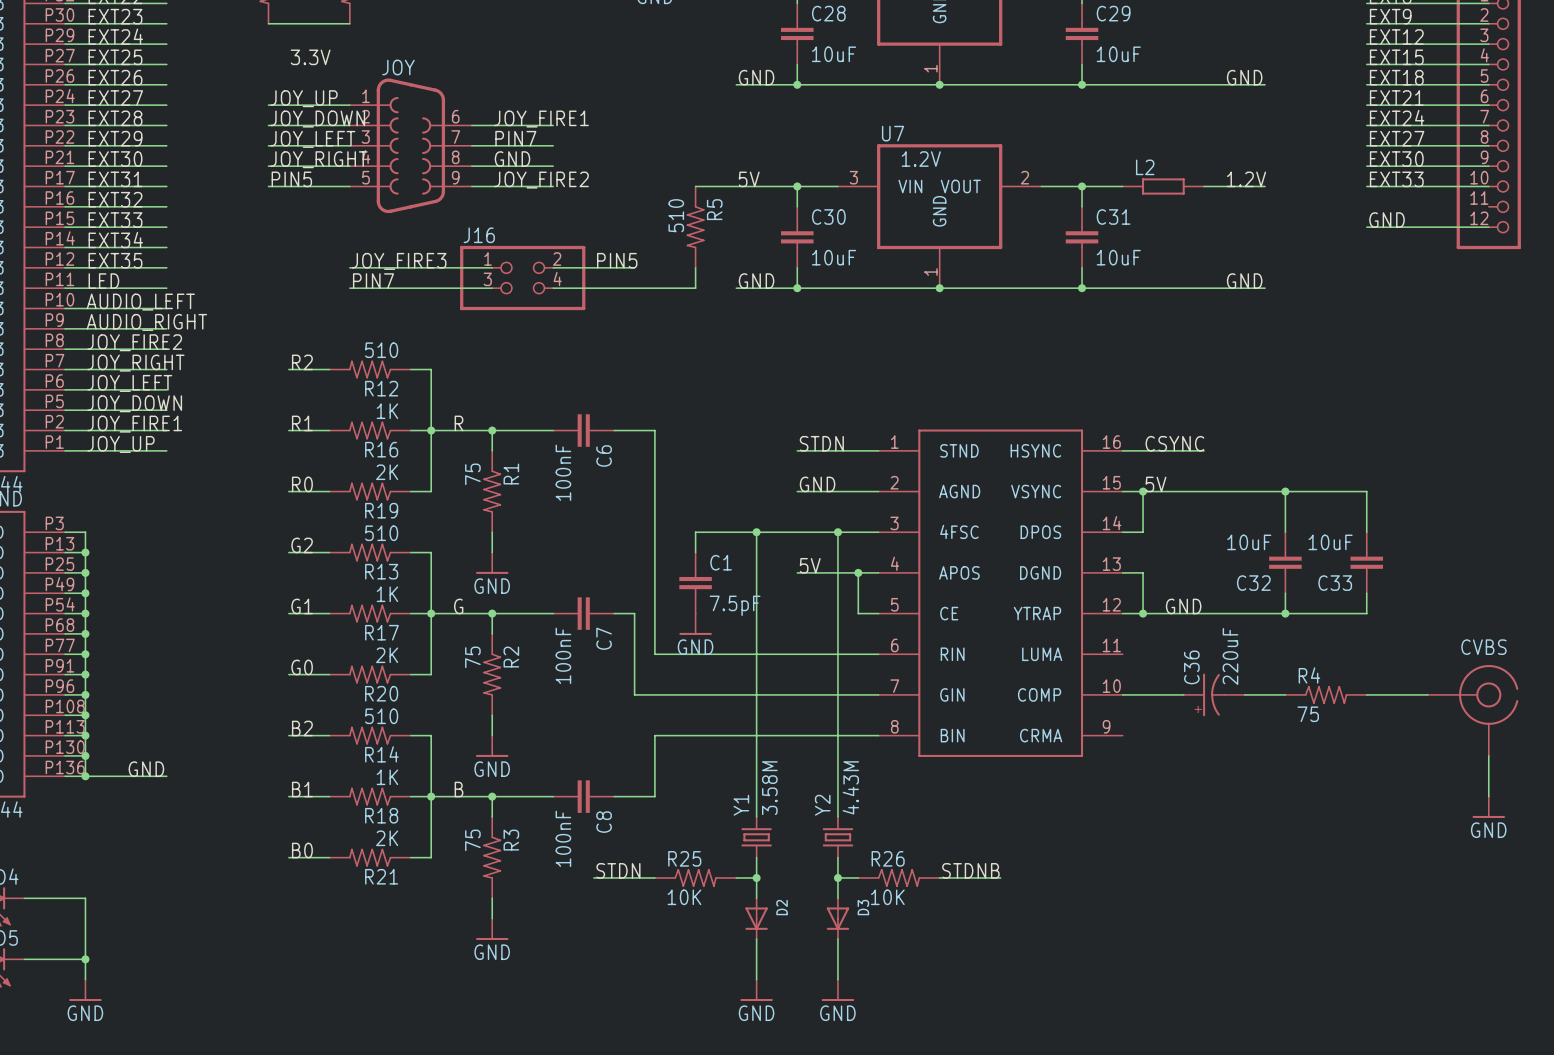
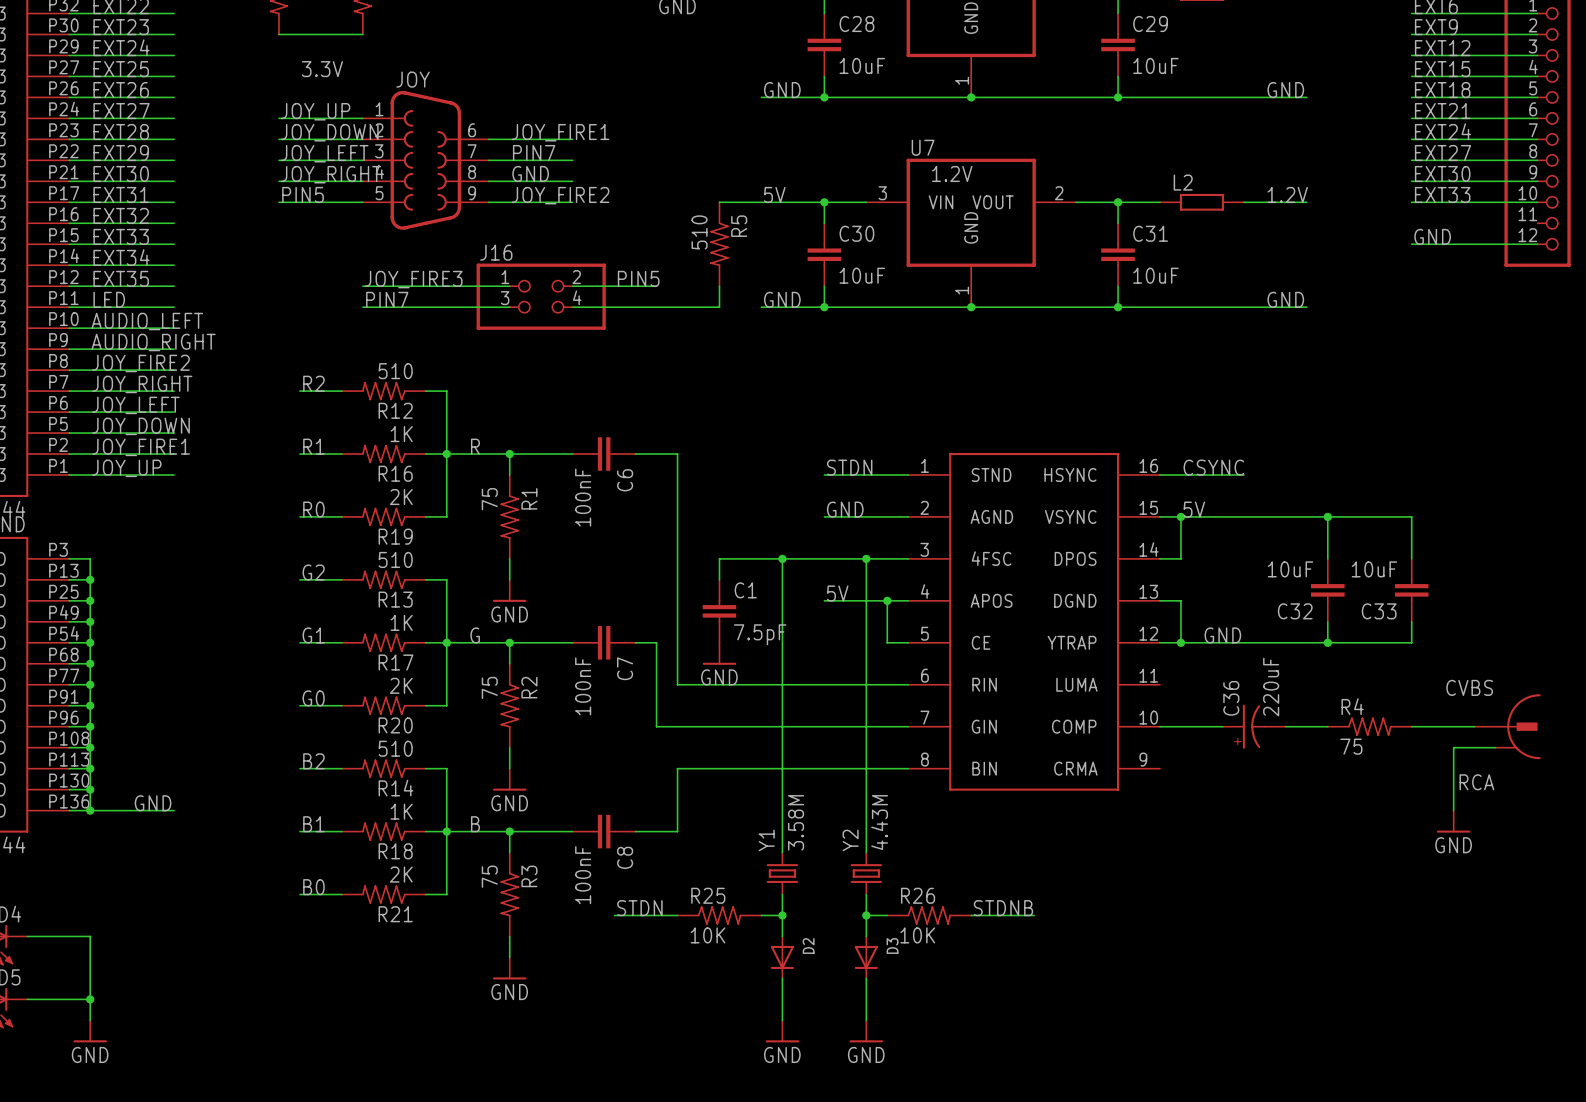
CVBS: none -> RCA (1507, 726)
CVBS: (1472, 710) -> none
wire: none -> (1495, 747) (1453, 747) (1453, 810)
wire: (1488, 755) (1488, 796) -> none
power symbol position: GND (1488, 807) -> GND (1453, 821)

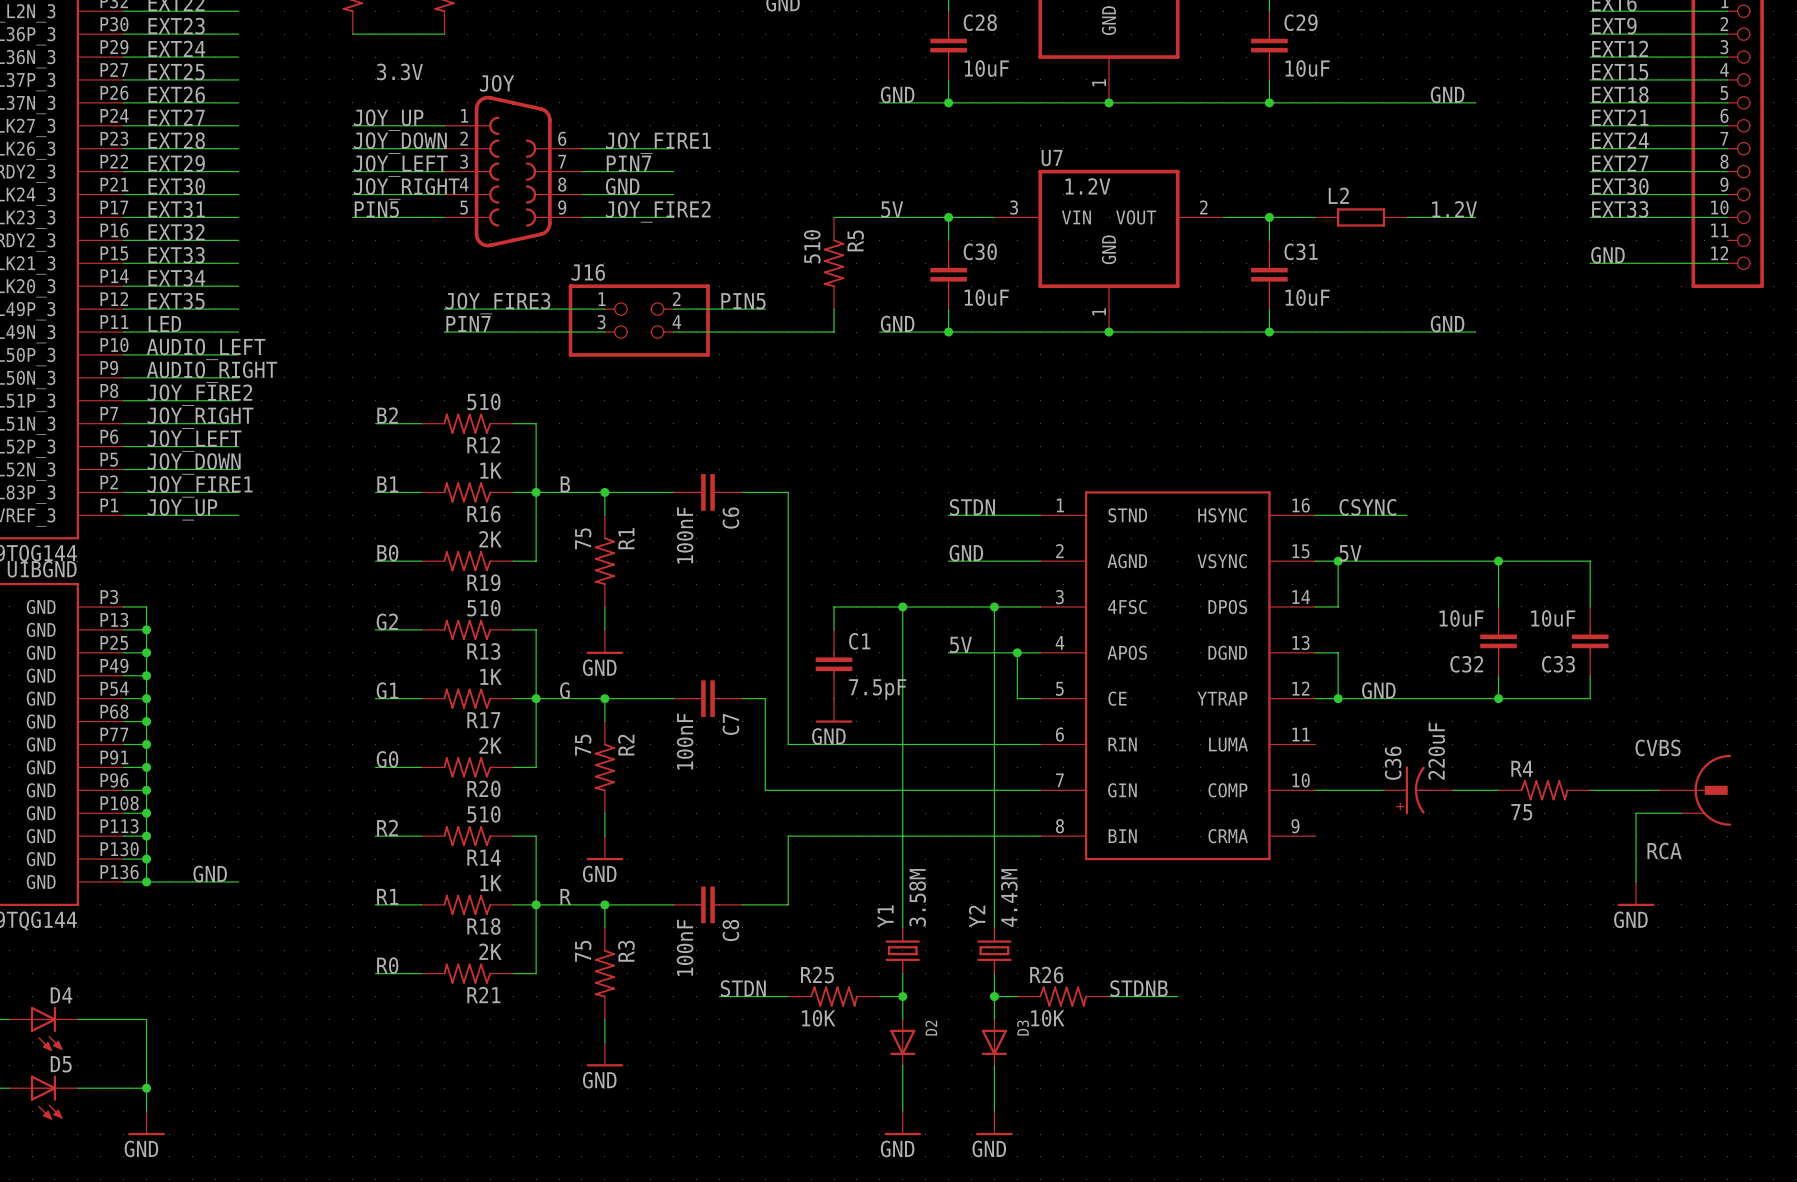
label: R2 (313, 383) -> B2 (387, 415)
label: R1 (313, 446) -> B1 (387, 484)
label: R (475, 446) -> B (565, 484)
label: R0 (313, 509) -> B0 (387, 553)
label: B2 (313, 761) -> R2 (387, 827)
label: B1 (313, 824) -> R1 (387, 896)
label: B (475, 824) -> R (565, 896)
label: B0 (313, 887) -> R0 (387, 965)

